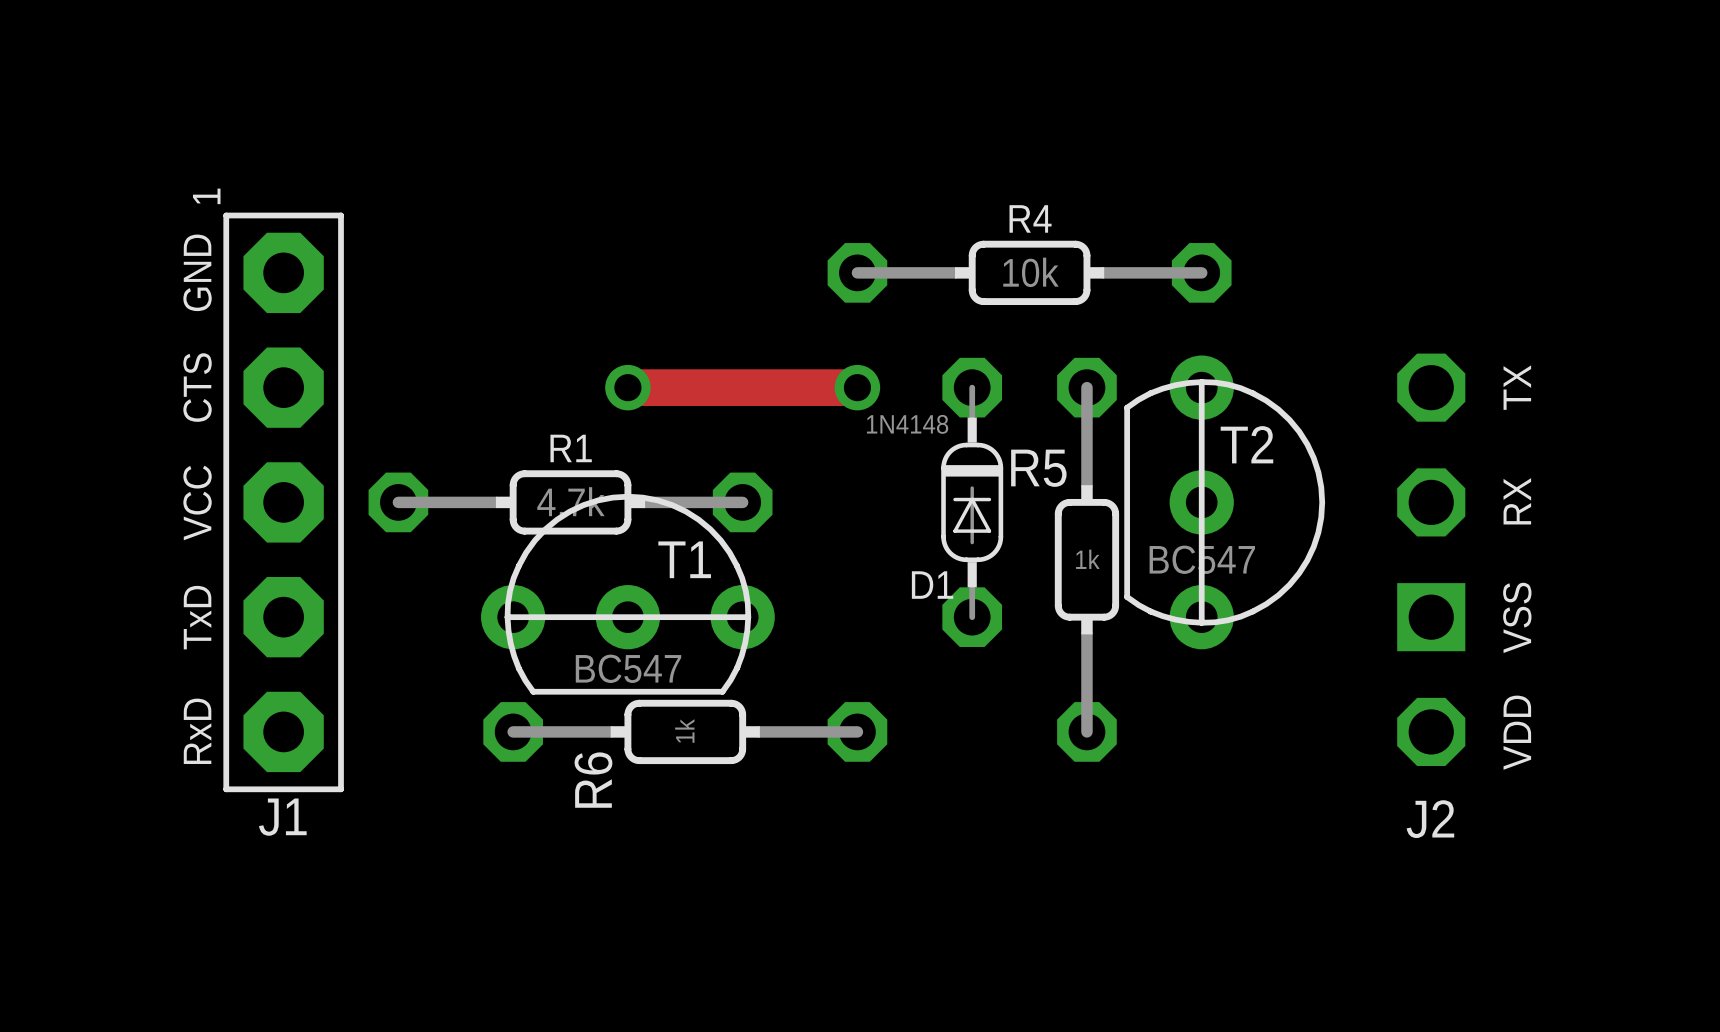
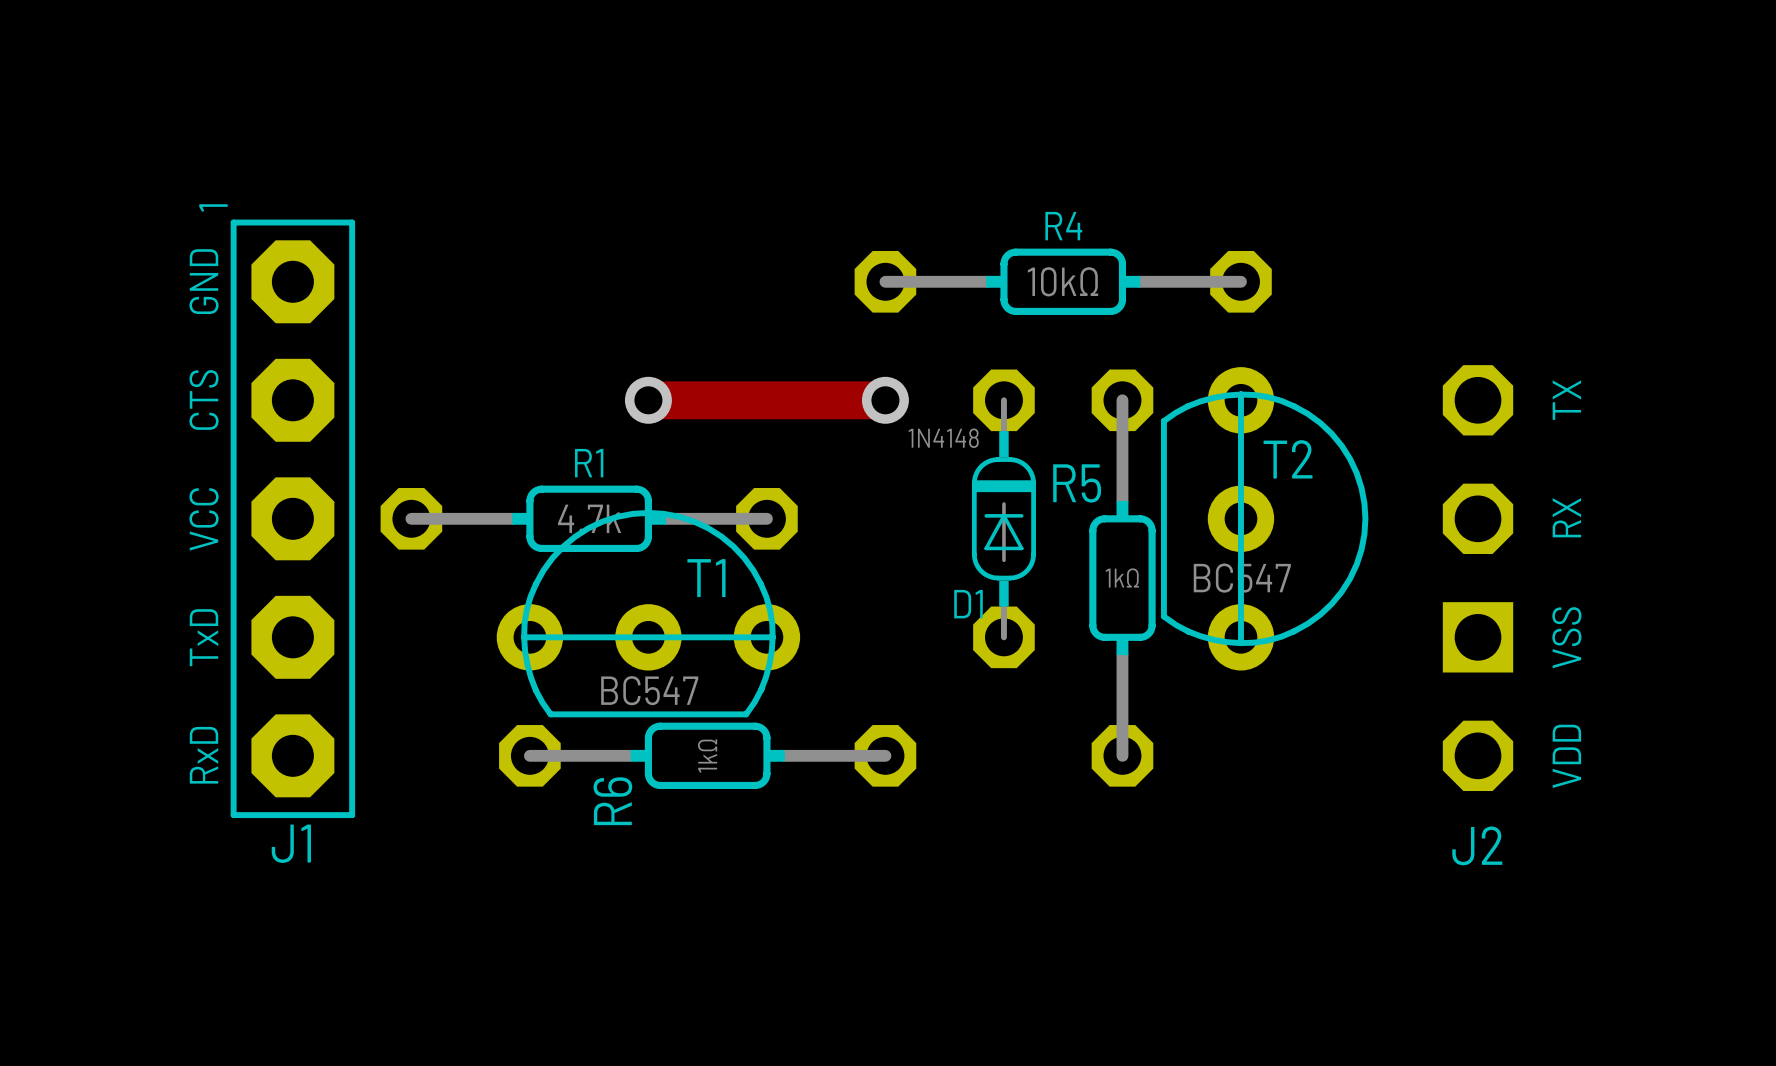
R4 value: 10k (1030, 272) -> 10kΩ (1062, 281)
R5 value: 1k (1087, 559) -> 1kΩ (1122, 577)
R6 value: 1k (684, 731) -> 1kΩ (707, 756)

